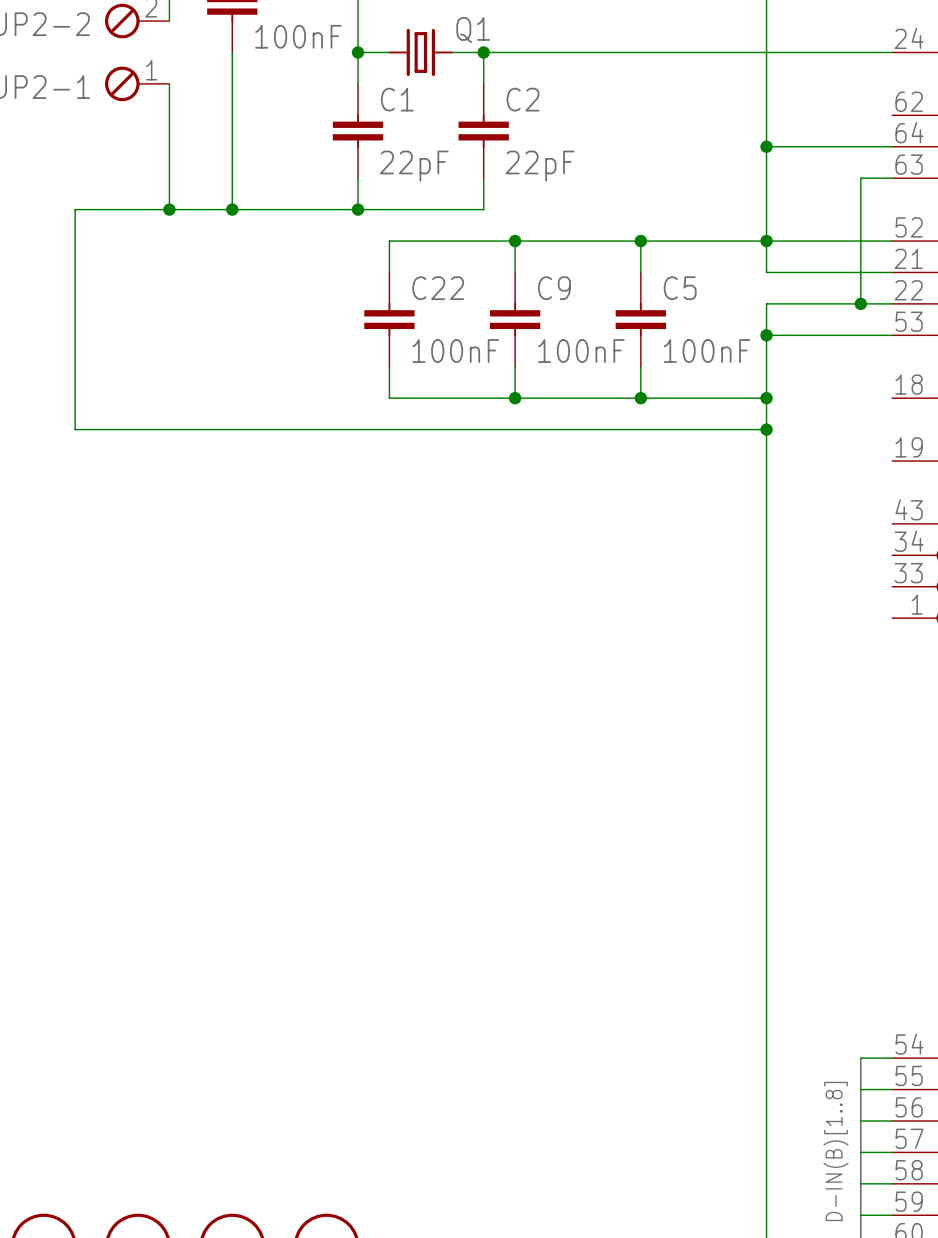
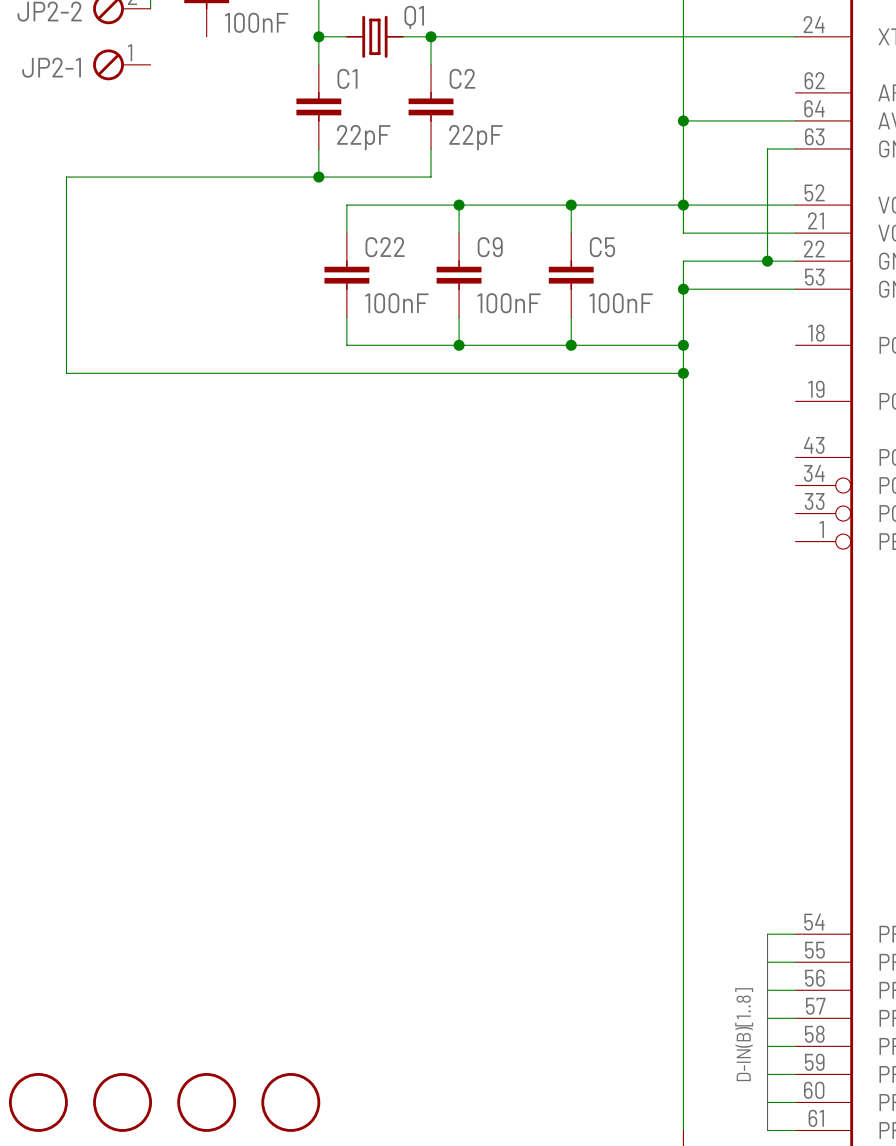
wire: (232, 52) (232, 209) -> none
wire: (169, 83) (169, 209) -> none
junction: (169, 209) -> none
junction: (232, 209) -> none

